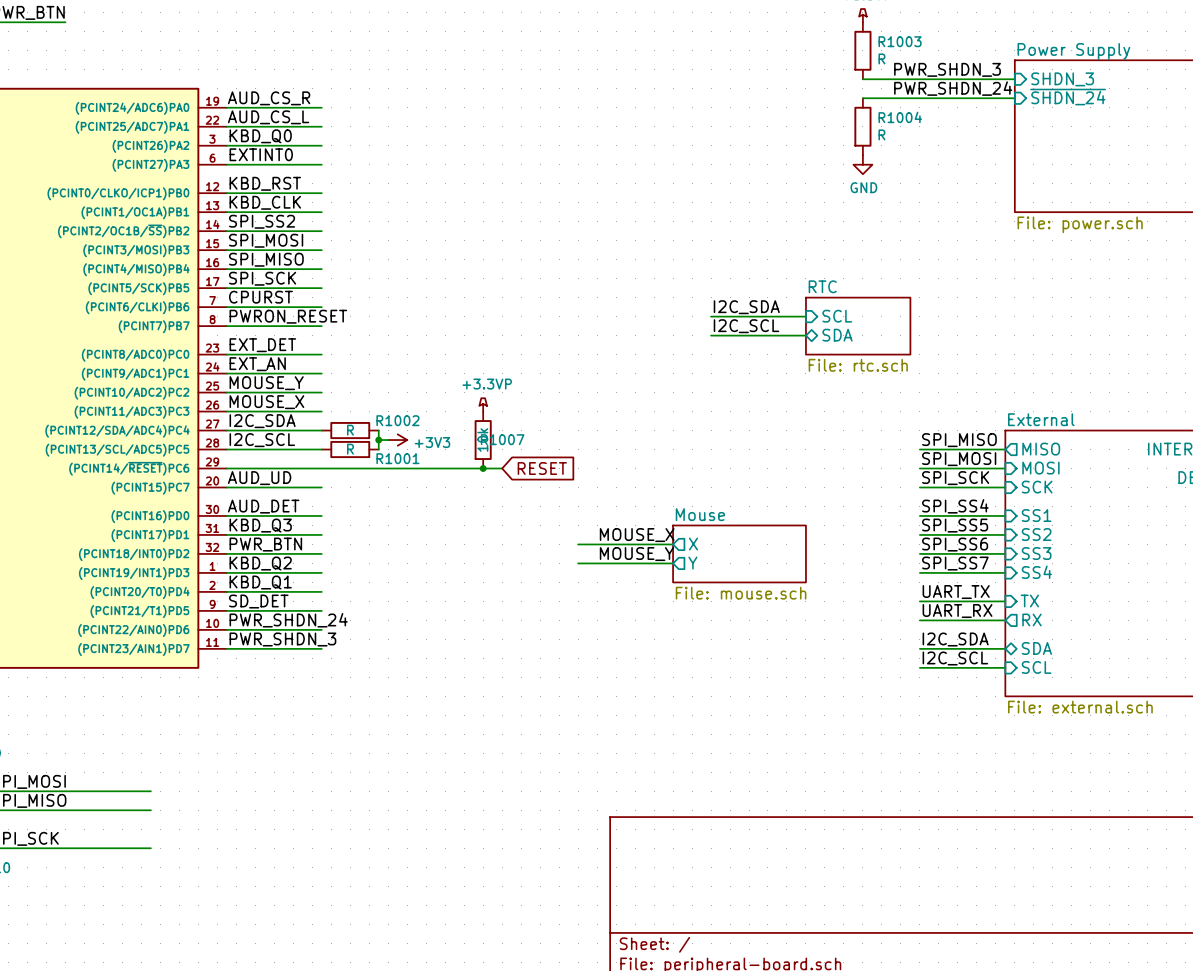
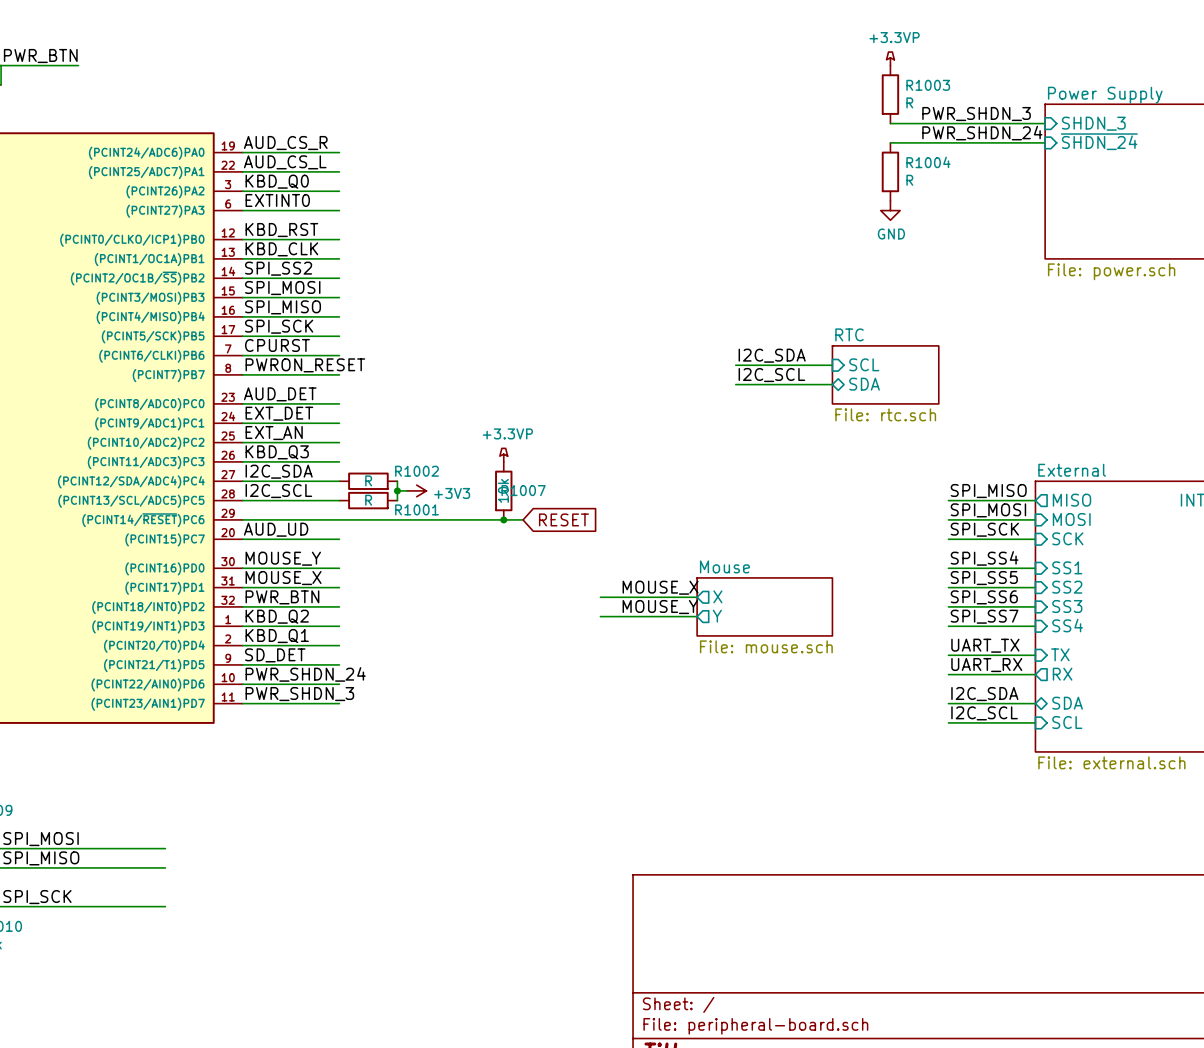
label: EXT_DET (262, 345) -> AUD_DET (280, 394)
label: EXT_AN (257, 364) -> EXT_DET (279, 413)
label: MOUSE_Y (266, 383) -> EXT_AN (274, 433)
label: MOUSE_X (266, 402) -> KBD_Q3 (277, 452)
label: AUD_DET (263, 506) -> MOUSE_Y (283, 558)
label: KBD_Q3 (260, 525) -> MOUSE_X (283, 578)

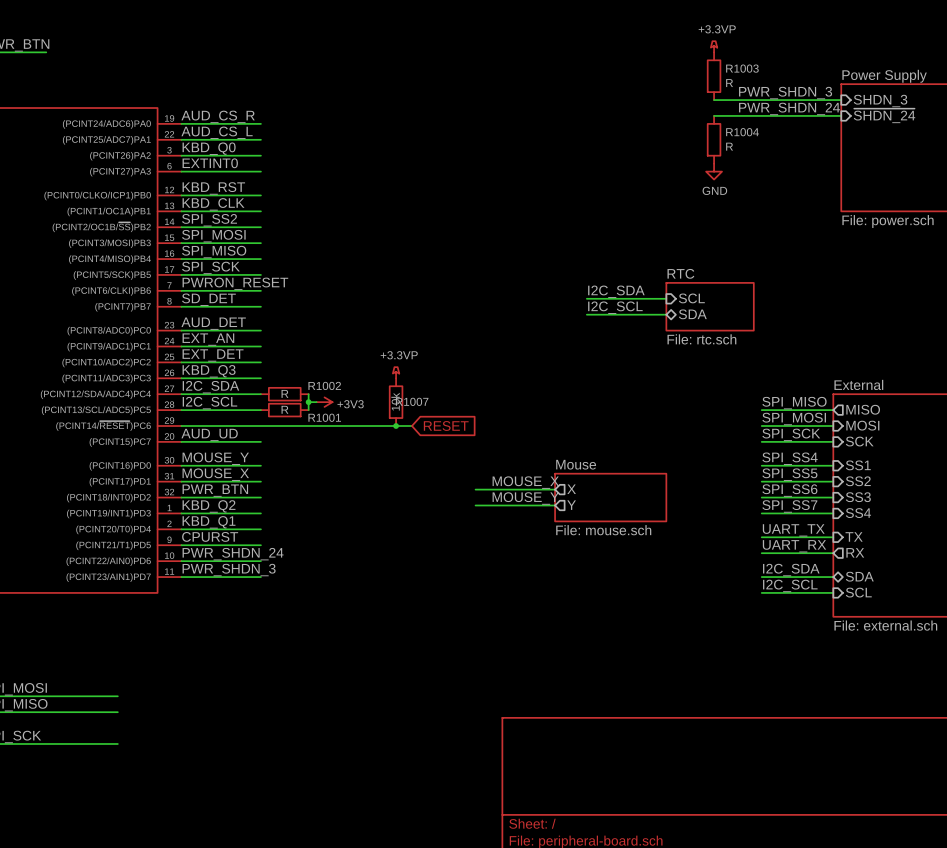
label: CPURST (277, 345) -> PWRON_RESET (235, 283)
label: PWRON_RESET (305, 365) -> SD_DET (208, 299)
label: EXT_DET (279, 413) -> EXT_AN (208, 339)
label: EXT_AN (274, 433) -> EXT_DET (213, 355)
label: SD_DET (275, 655) -> CPURST (210, 536)

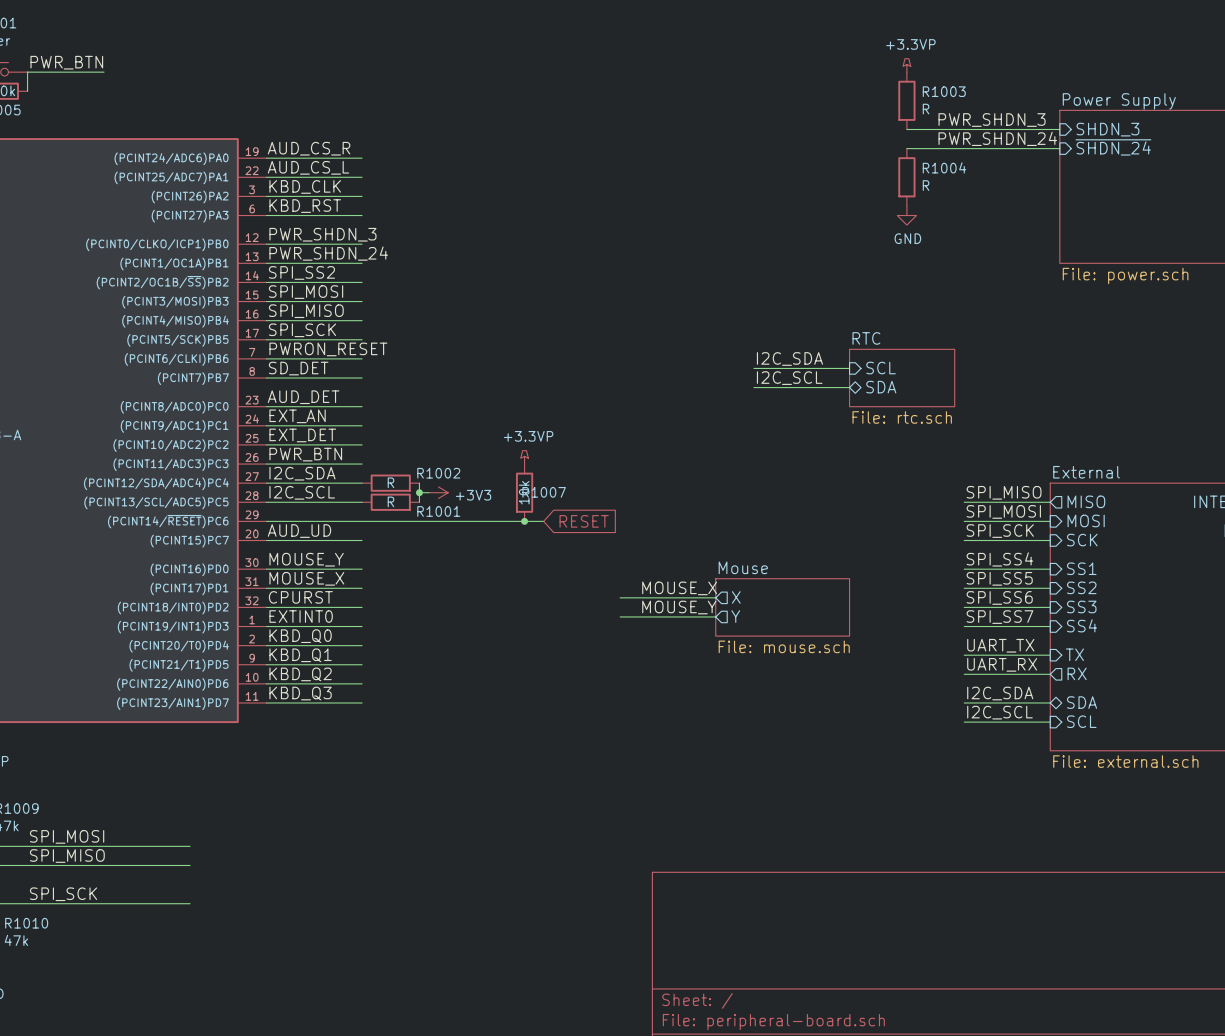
label: KBD_Q0 (209, 148) -> KBD_CLK (305, 186)
label: EXTINT0 (210, 163) -> KBD_RST (305, 206)
label: KBD_RST (213, 188) -> PWR_SHDN_3 (322, 234)
label: KBD_CLK (213, 204) -> PWR_SHDN_24 (328, 253)
label: KBD_Q3 (209, 371) -> PWR_BTN (305, 454)
label: PWR_BTN (215, 490) -> CPURST (300, 597)
label: KBD_Q2 (209, 506) -> EXTINT0 (301, 616)
label: KBD_Q1 (209, 522) -> KBD_Q0 (300, 636)
label: CPURST (210, 536) -> KBD_Q1 (300, 655)
label: PWR_SHDN_24 (233, 554) -> KBD_Q2 (300, 674)
label: PWR_SHDN_3 (229, 570) -> KBD_Q3 (300, 693)

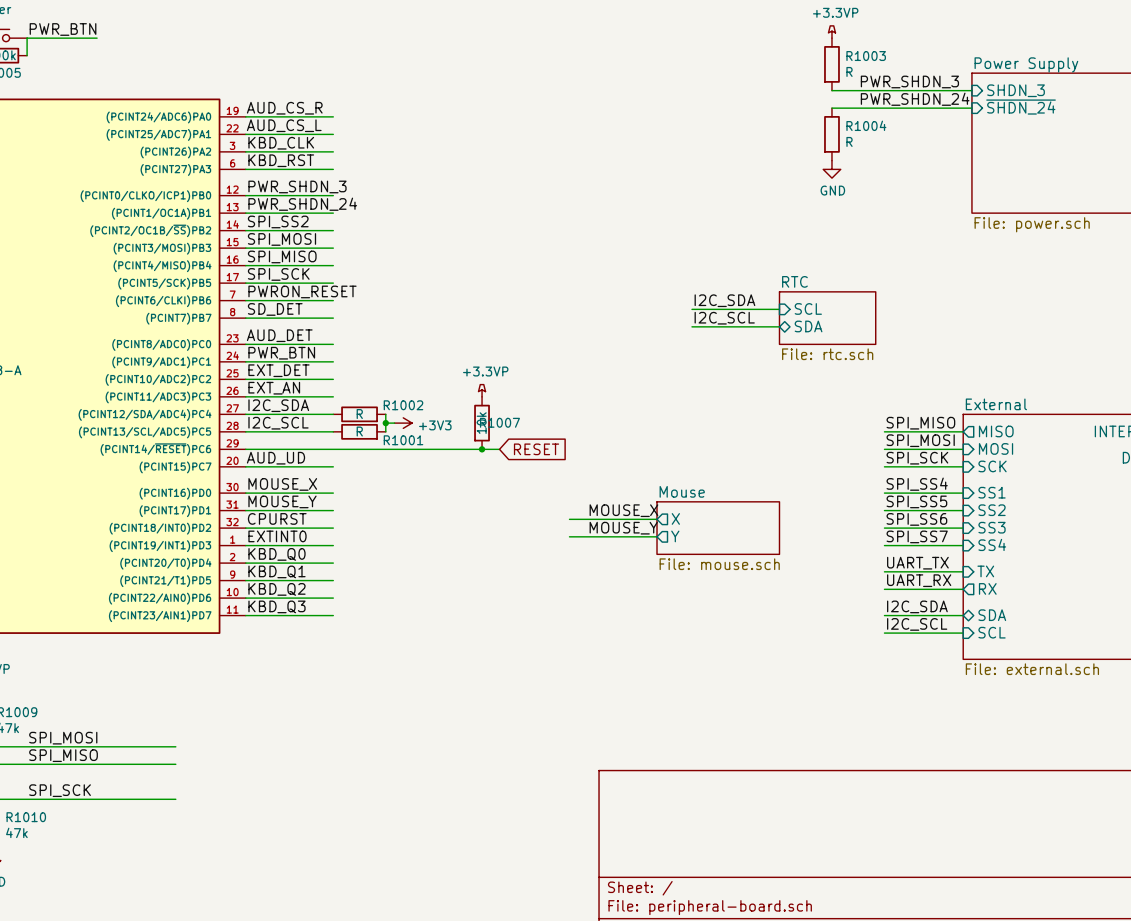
label: EXT_AN (297, 416) -> PWR_BTN (281, 353)
label: PWR_BTN (305, 454) -> EXT_AN (274, 388)
label: MOUSE_Y (306, 559) -> MOUSE_X (282, 484)
label: MOUSE_X (306, 578) -> MOUSE_Y (282, 501)

